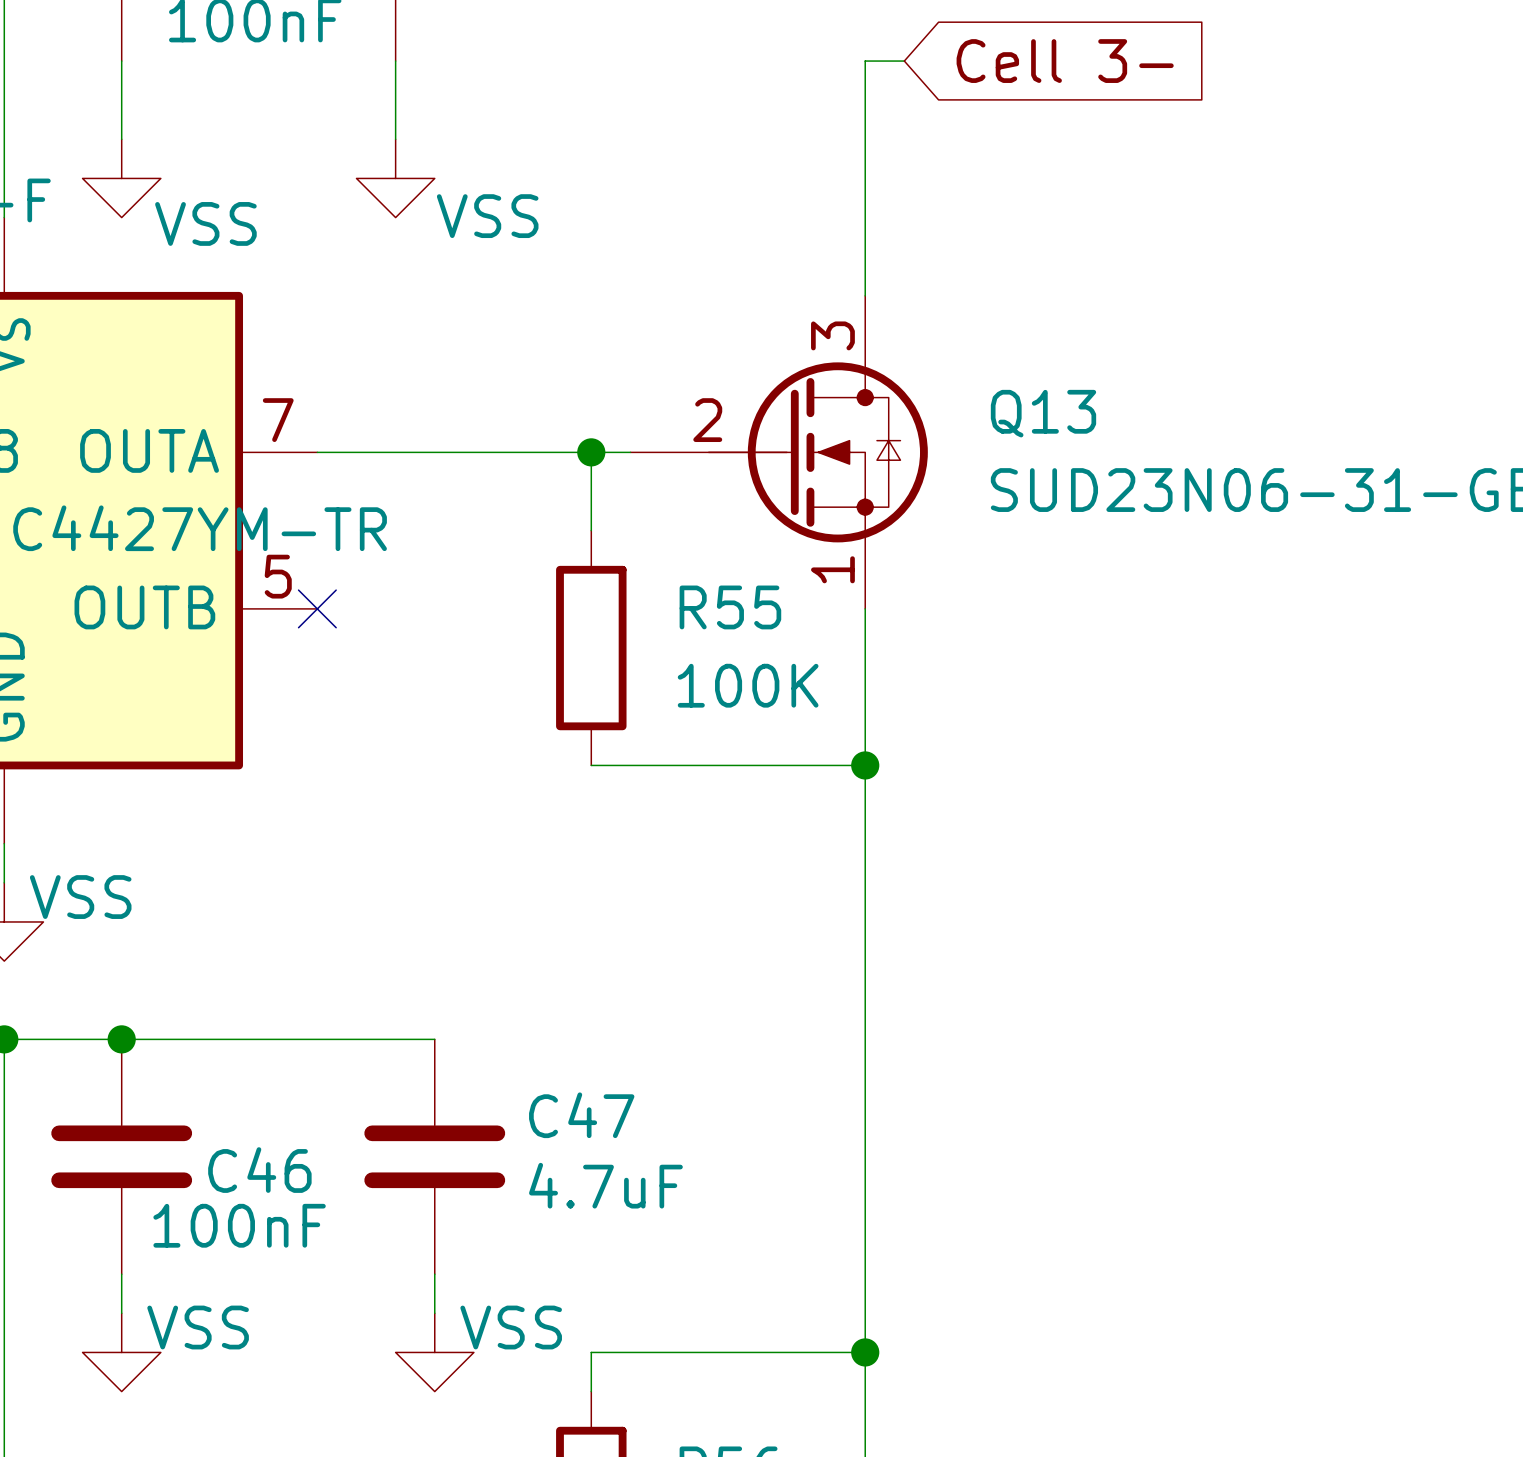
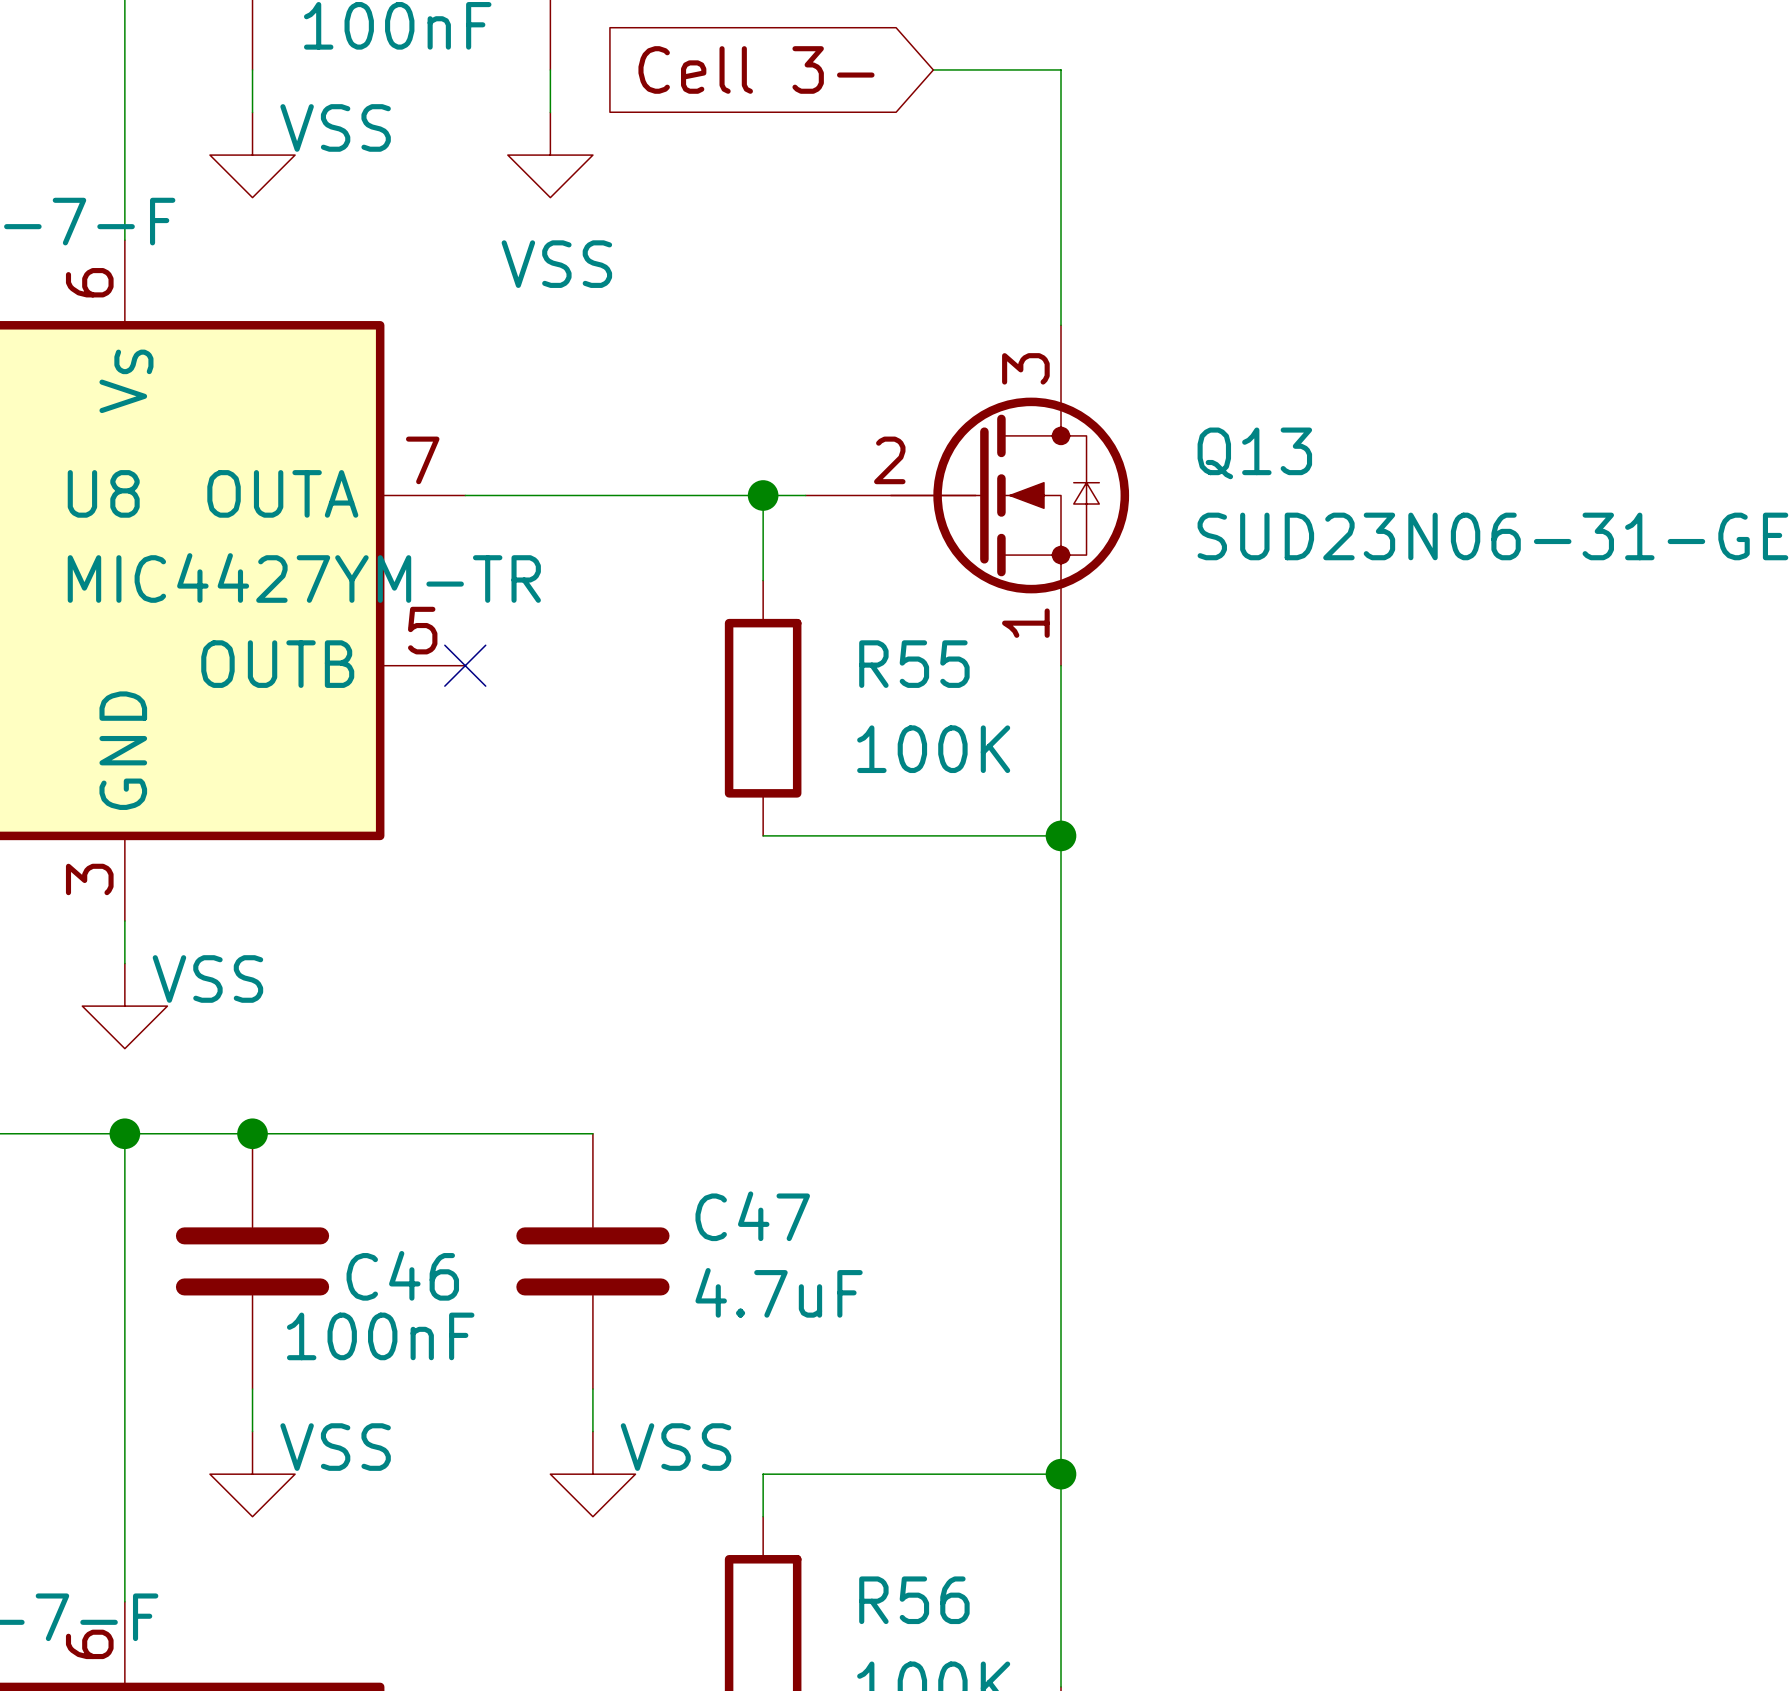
wire: (865, 61) (904, 61) -> (1061, 69) (933, 69)
global label rotation: 0° (1065, 61) -> 180° (756, 69)
global label position: Cell 3- (1065, 61) -> Cell 3- (756, 69)
power symbol position: VSS (121, 178) -> VSS (252, 155)
power symbol position: VSS (395, 178) -> VSS (550, 155)
power symbol text position: VSS (487, 216) -> VSS (556, 264)
power symbol text position: VSS (205, 223) -> VSS (335, 127)

